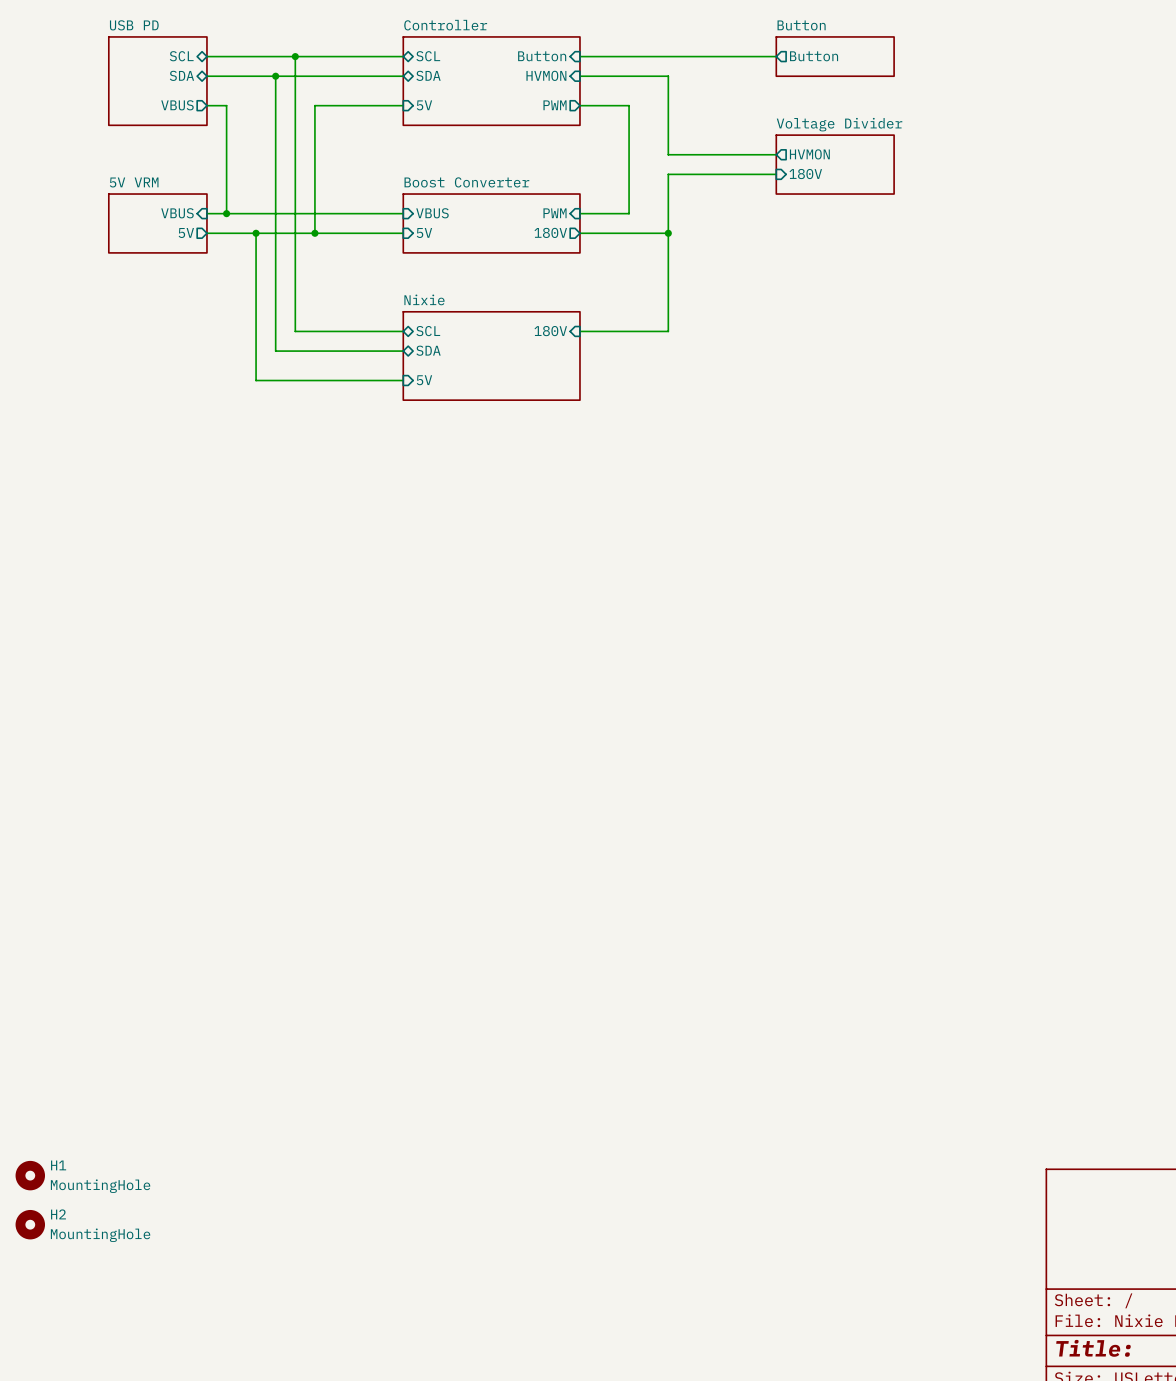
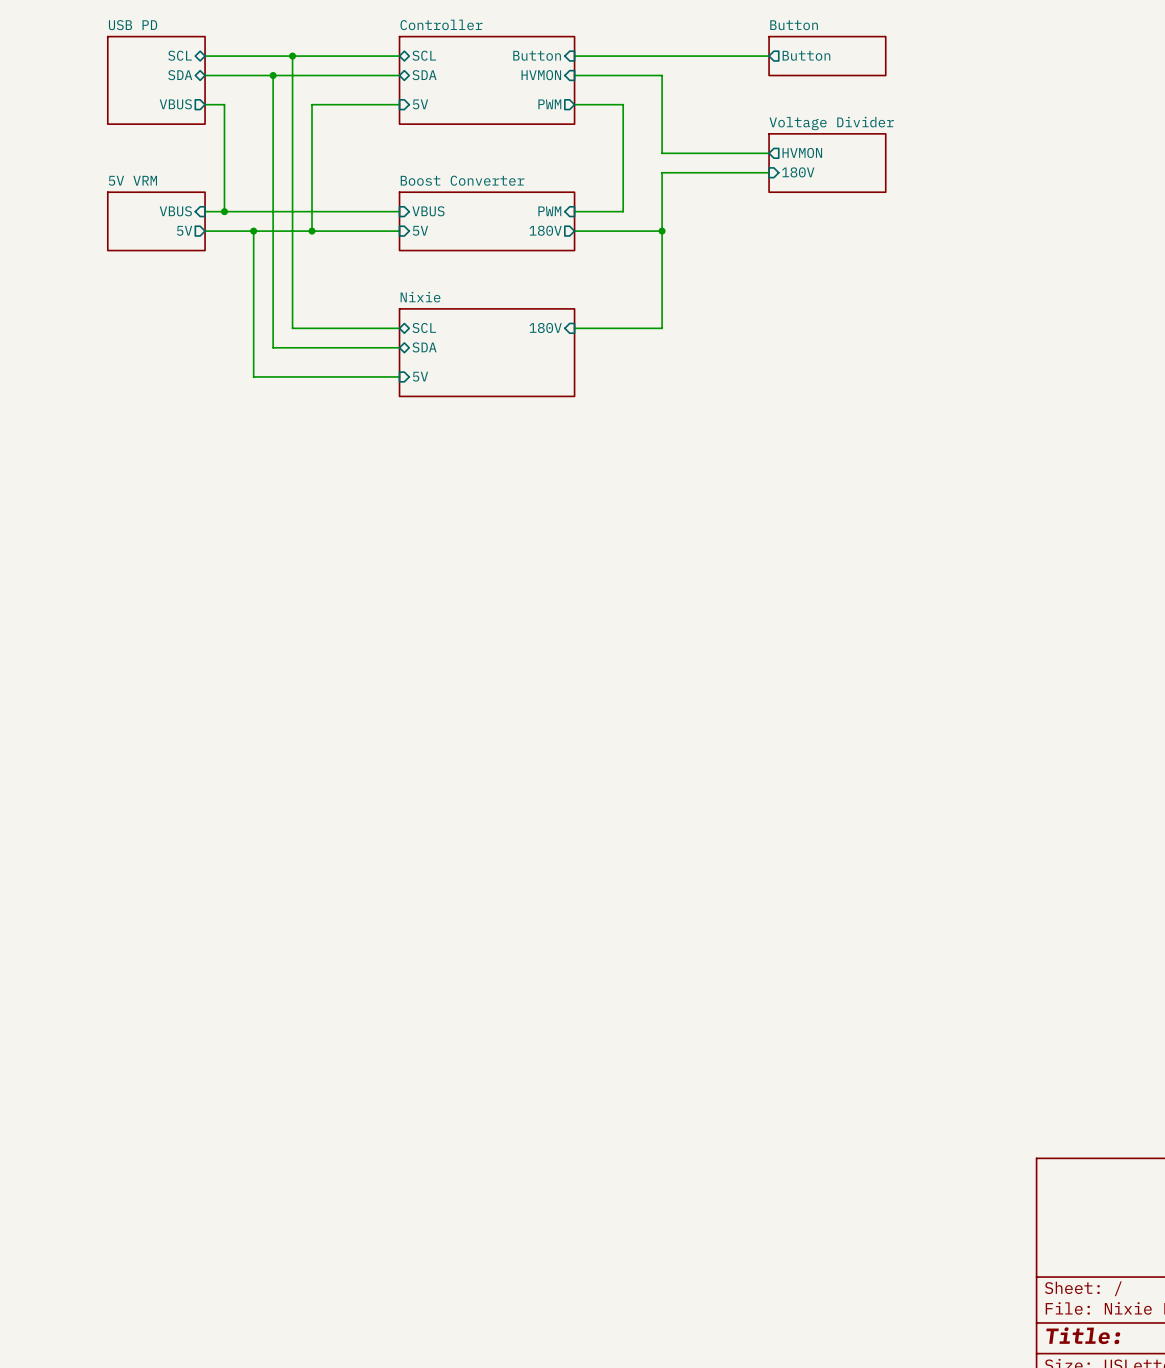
H1: MountingHole (30, 1175) -> none
H2: MountingHole (30, 1224) -> none

